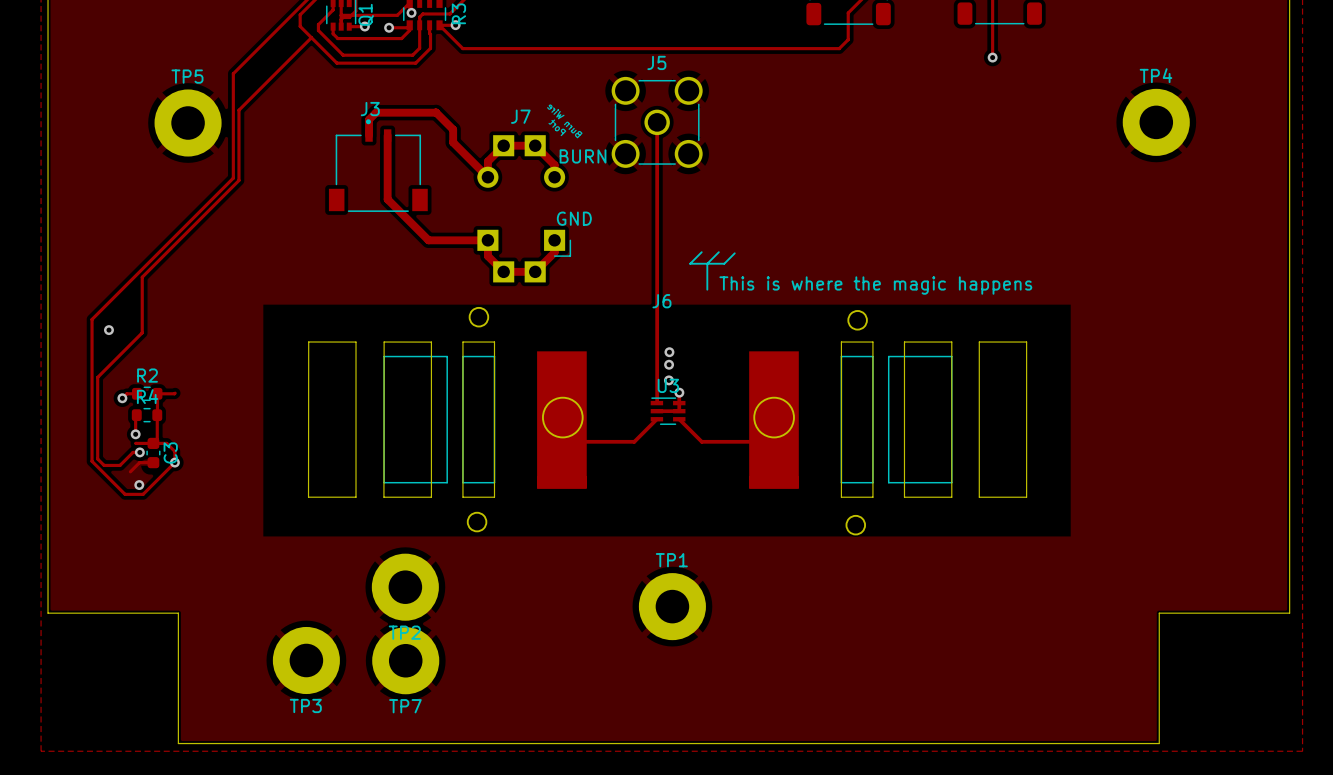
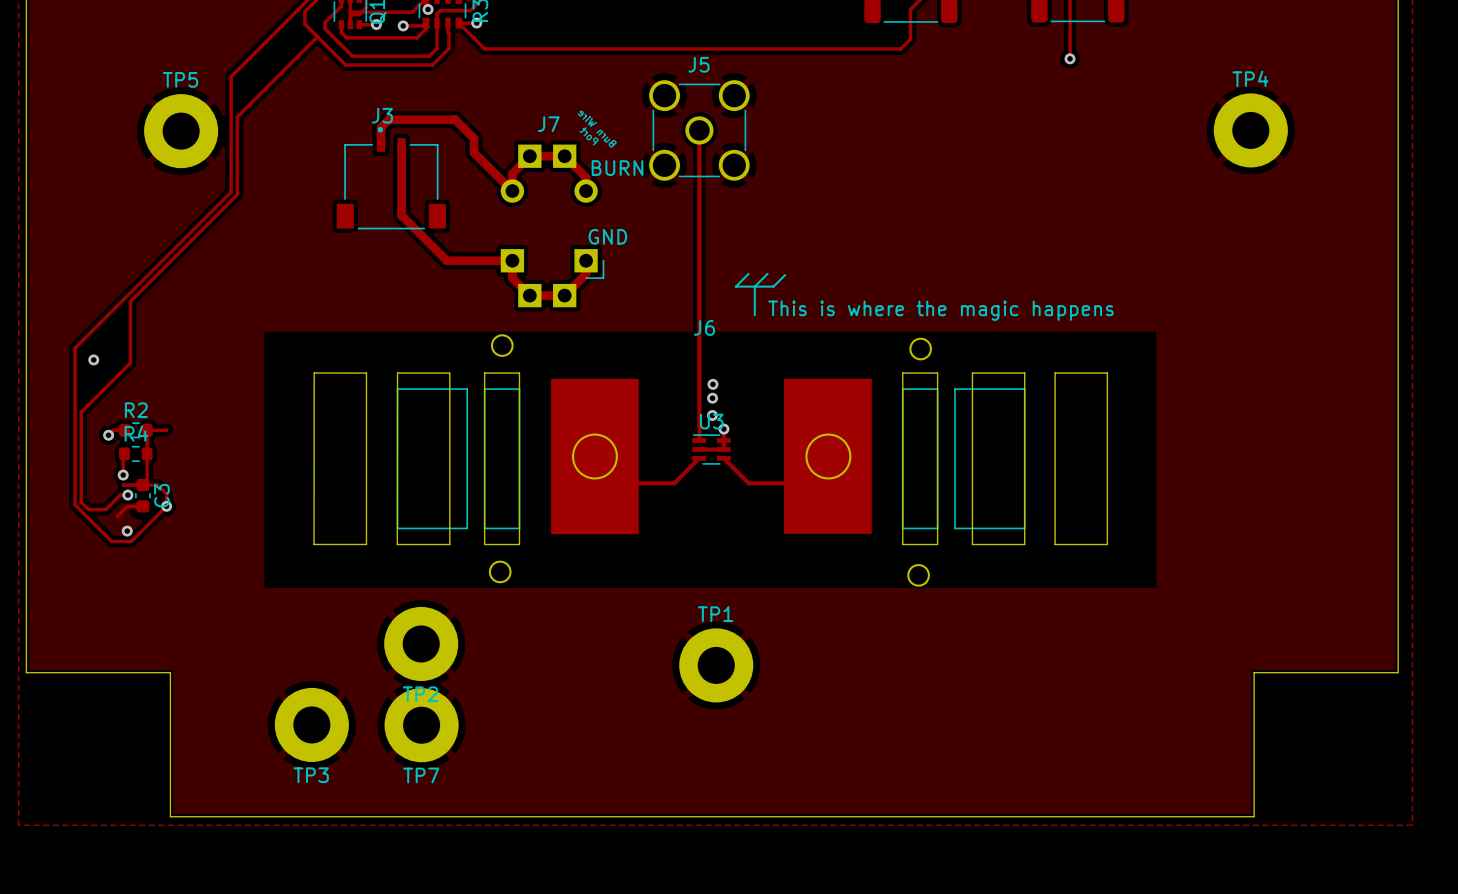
J6 footprint: [308, 306, 1027, 536] -> [313, 334, 1108, 587]

